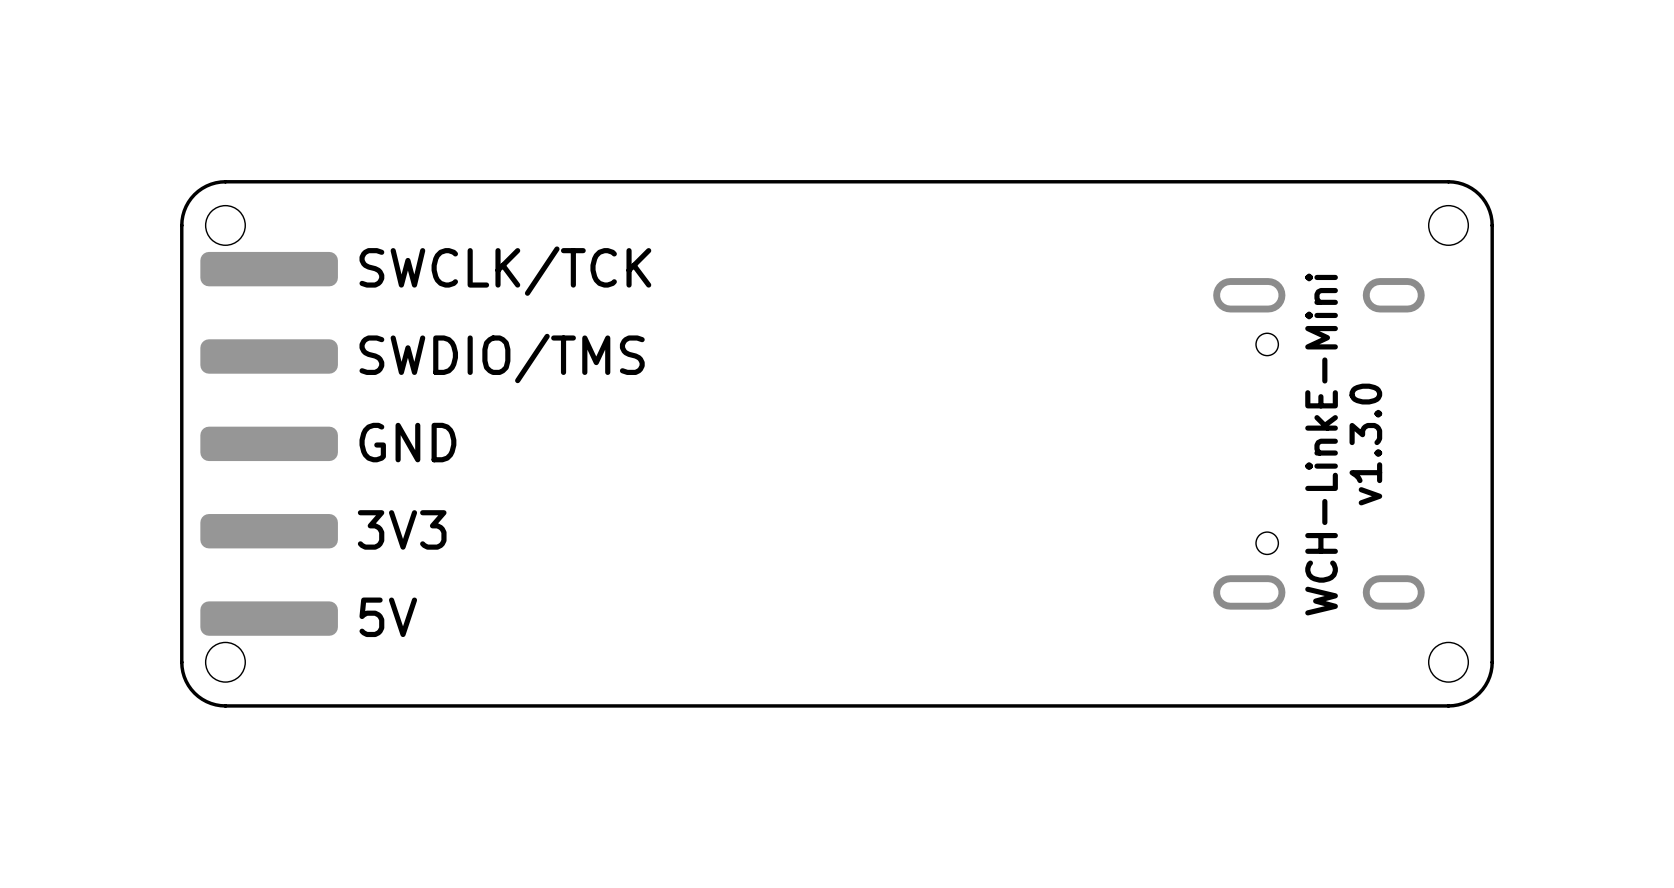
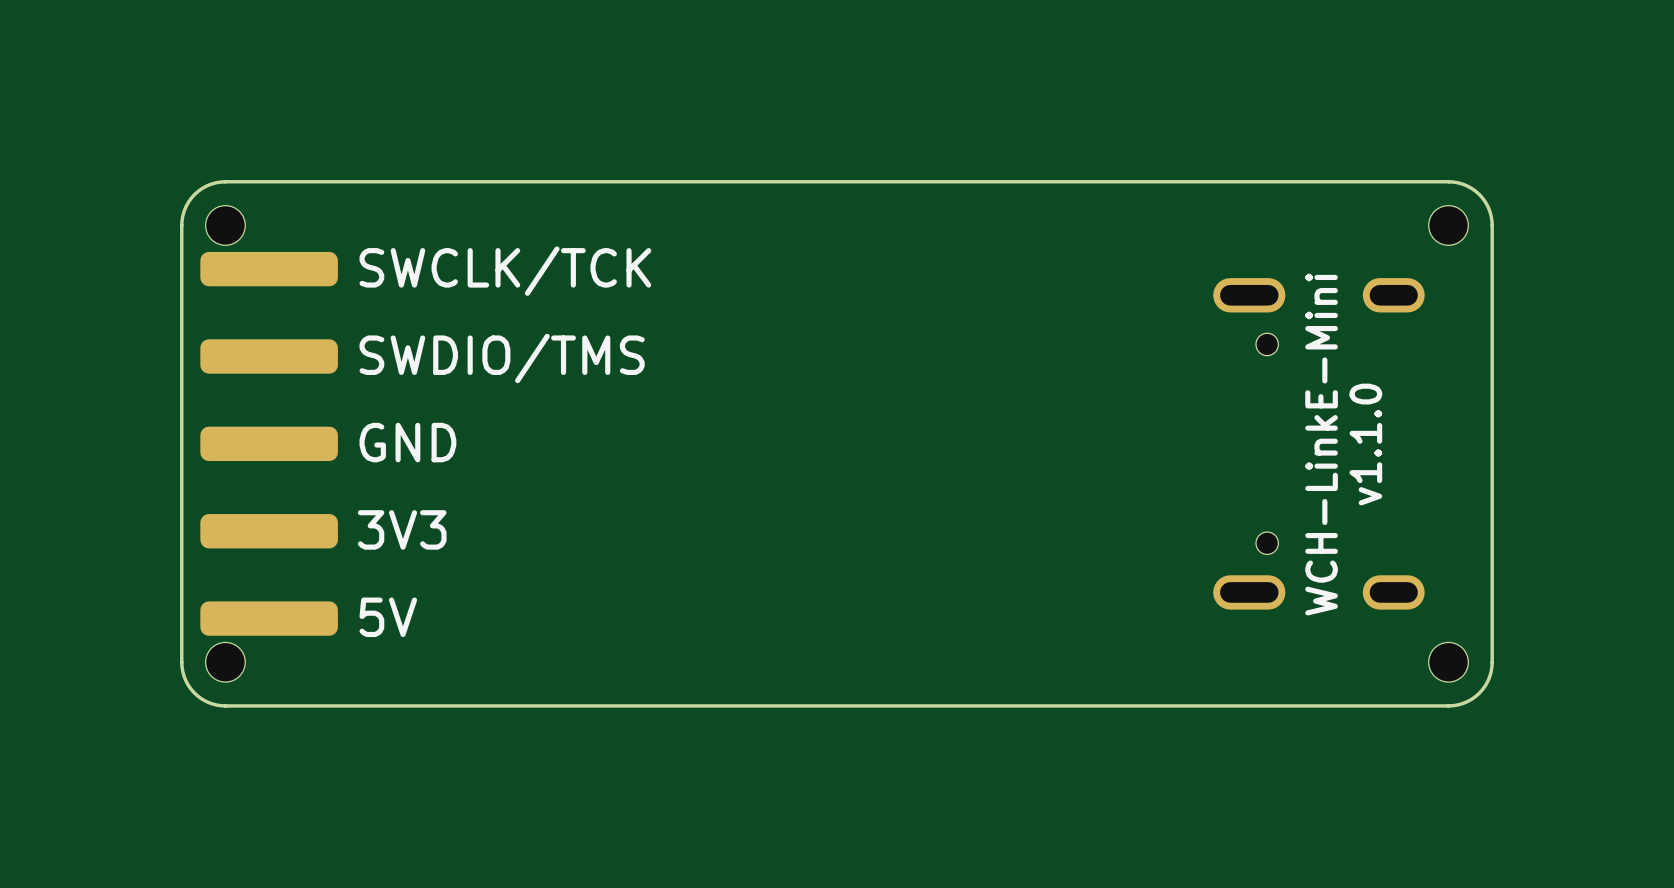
text: v1.3.0 (1365, 444) -> v1.1.0 (1365, 444)

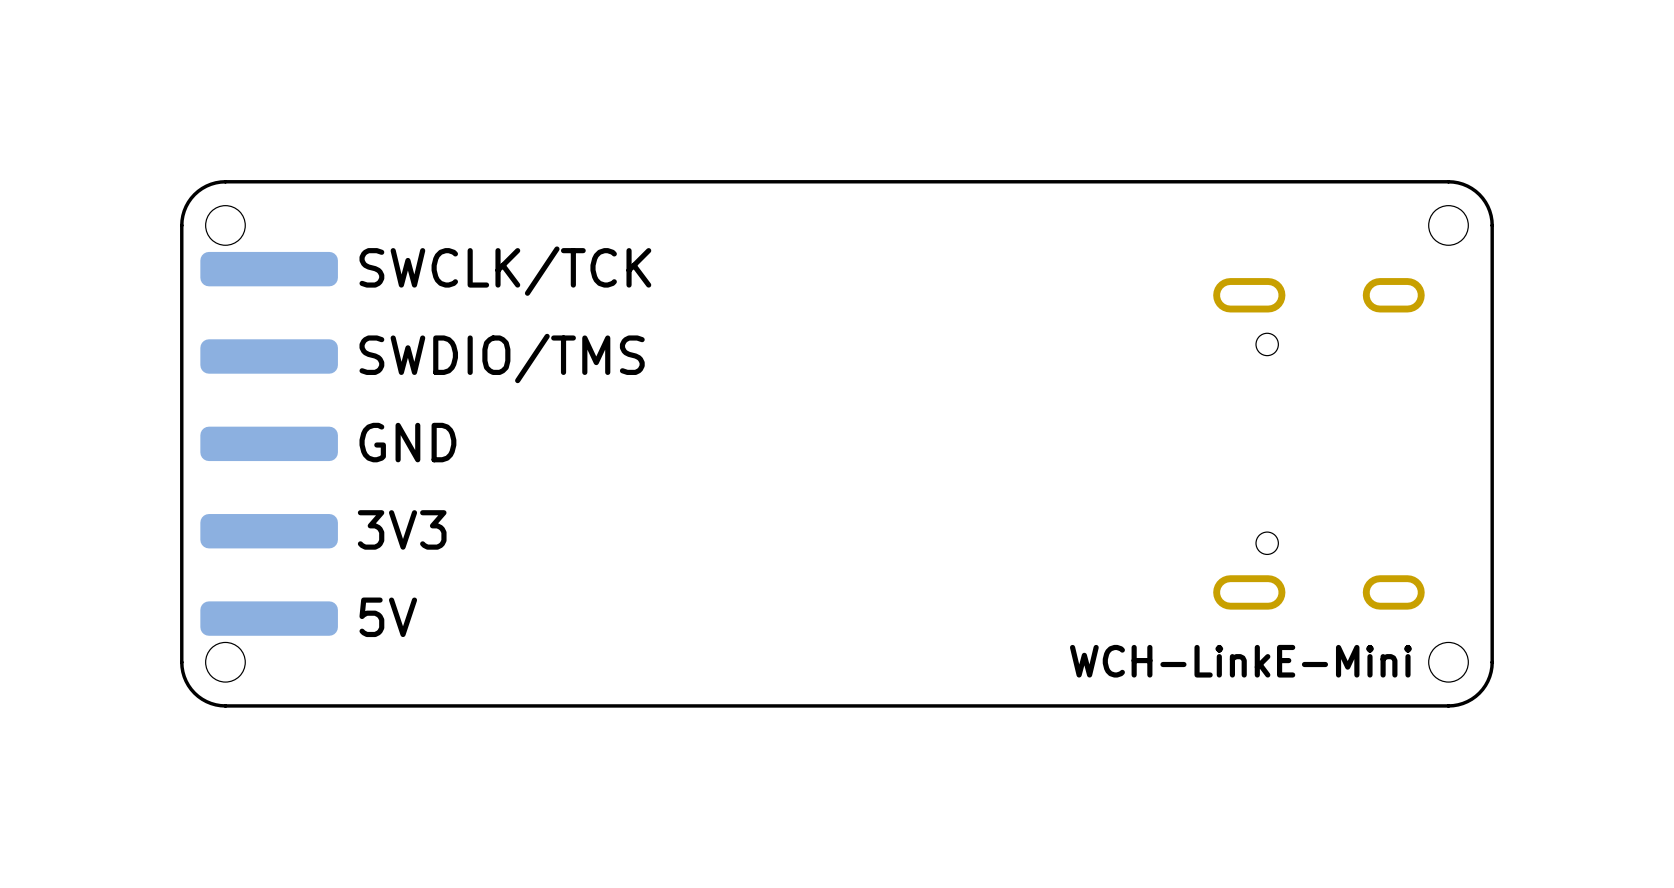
text rotation: 0° (1321, 444) -> 90° clockwise (1240, 661)
text: v1.1.0 (1365, 444) -> none

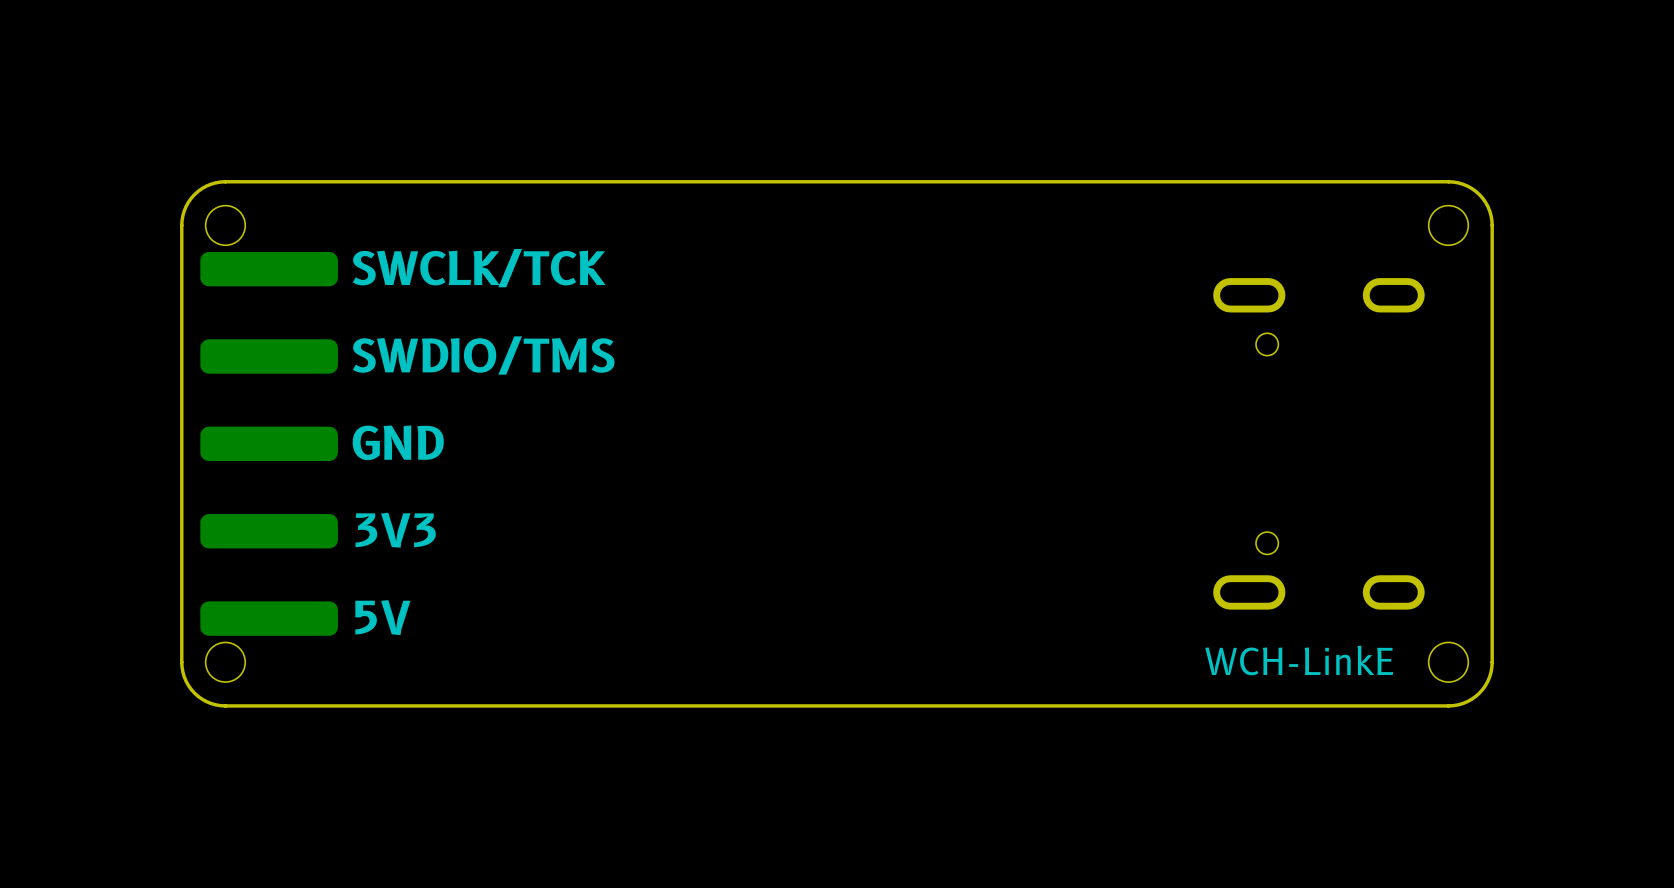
text: WCH-LinkE-Mini (1240, 661) -> WCH-LinkE (1299, 660)

